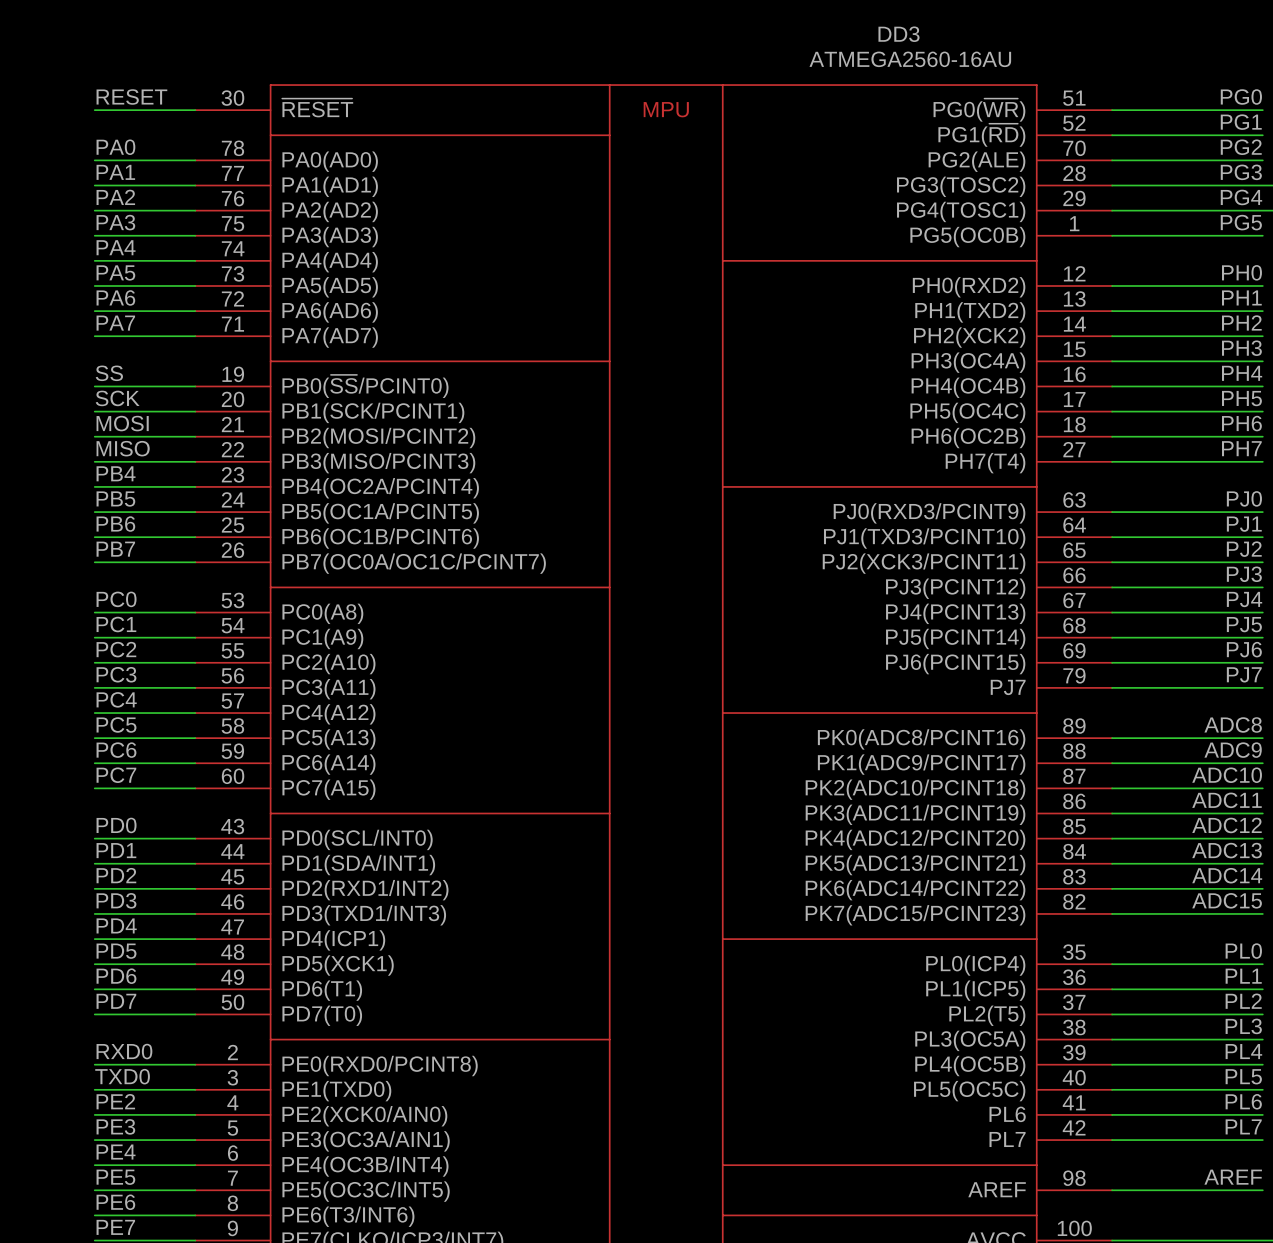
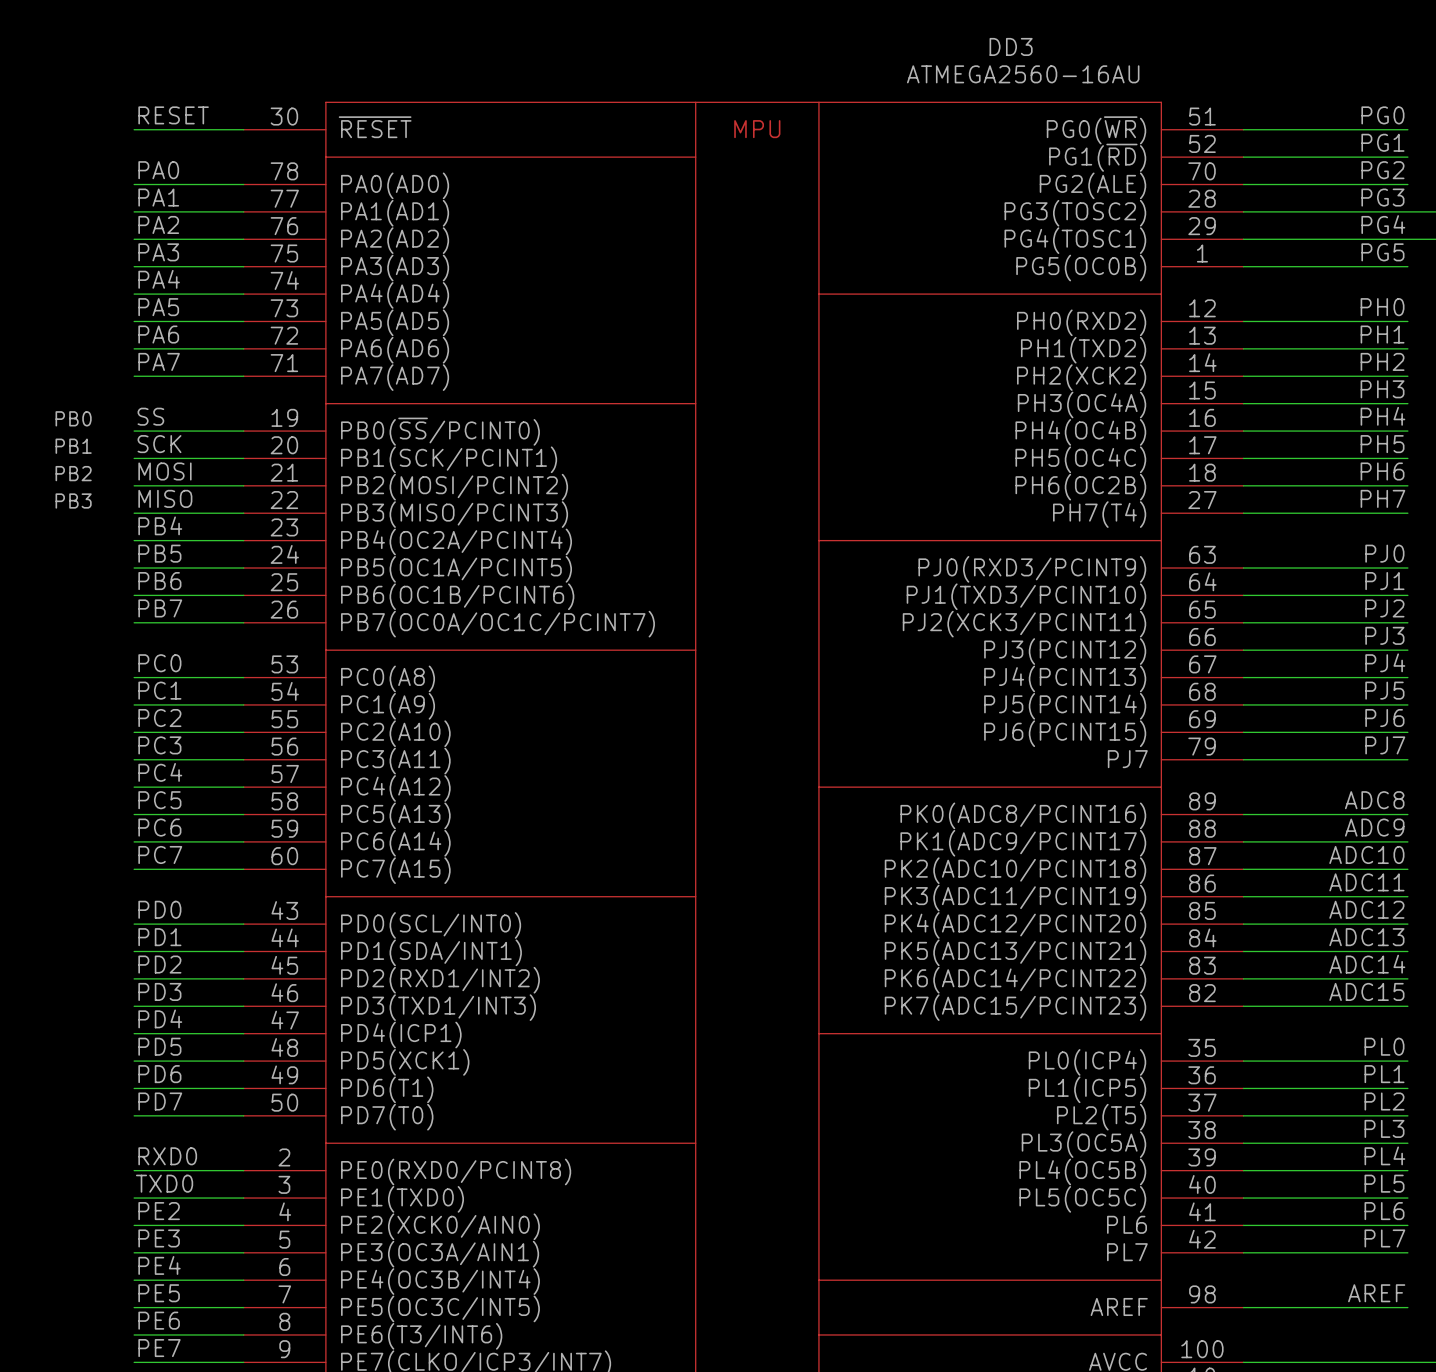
label: none -> PB0 (73, 418)
label: none -> PB1 (73, 446)
label: none -> PB2 (73, 473)
label: none -> PB3 (73, 501)

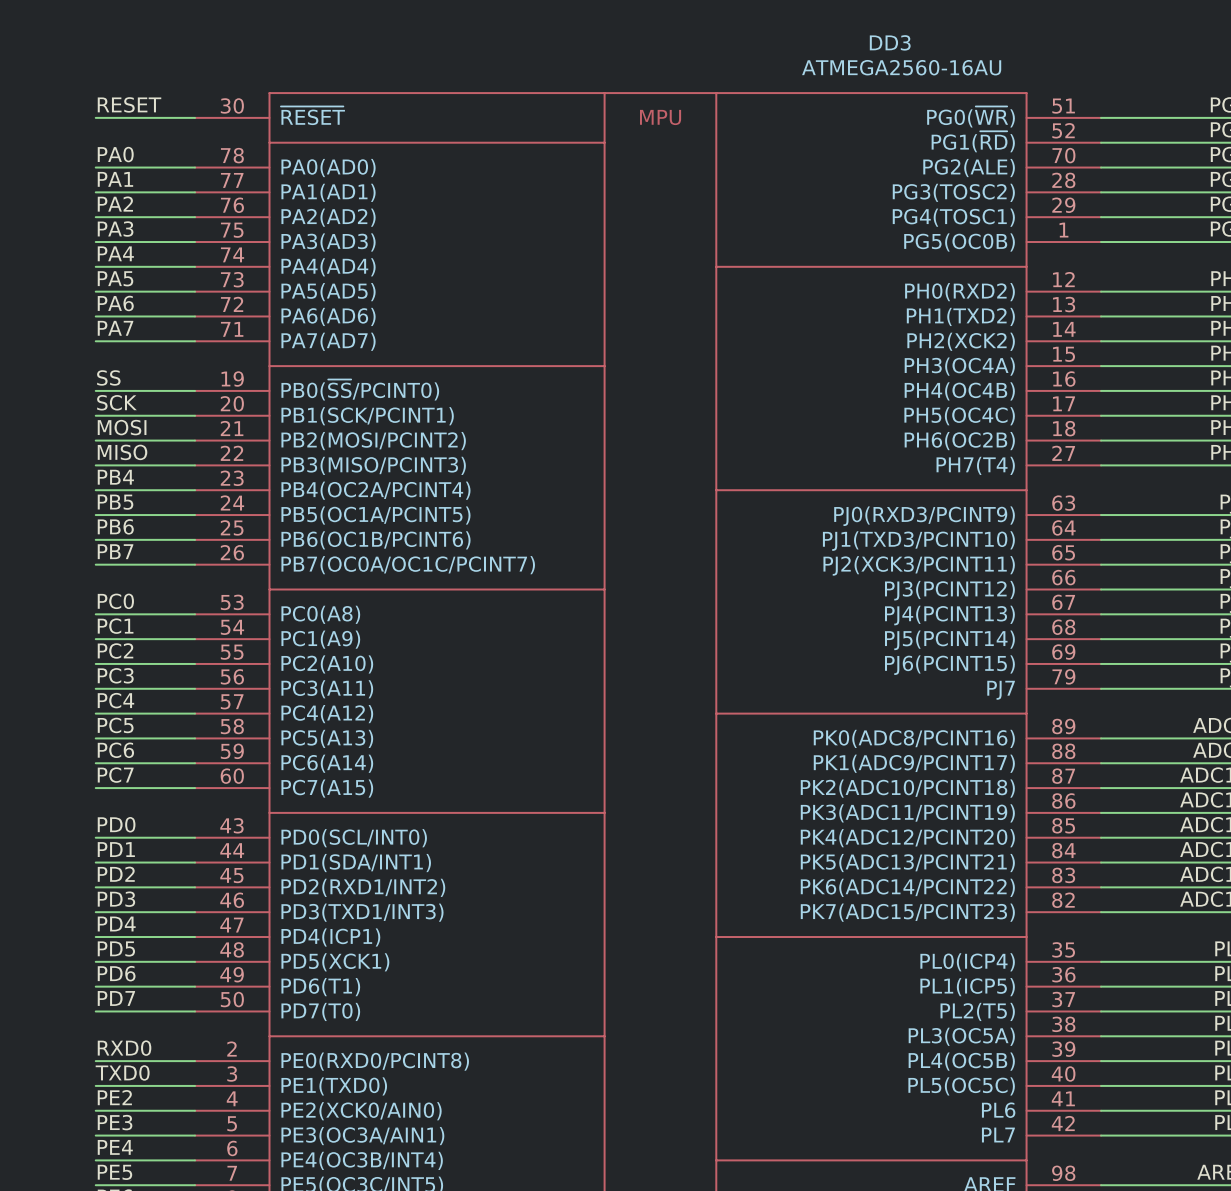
label: PB0 (73, 418) -> none
label: PB1 (73, 446) -> none
label: PB2 (73, 473) -> none
label: PB3 (73, 501) -> none

